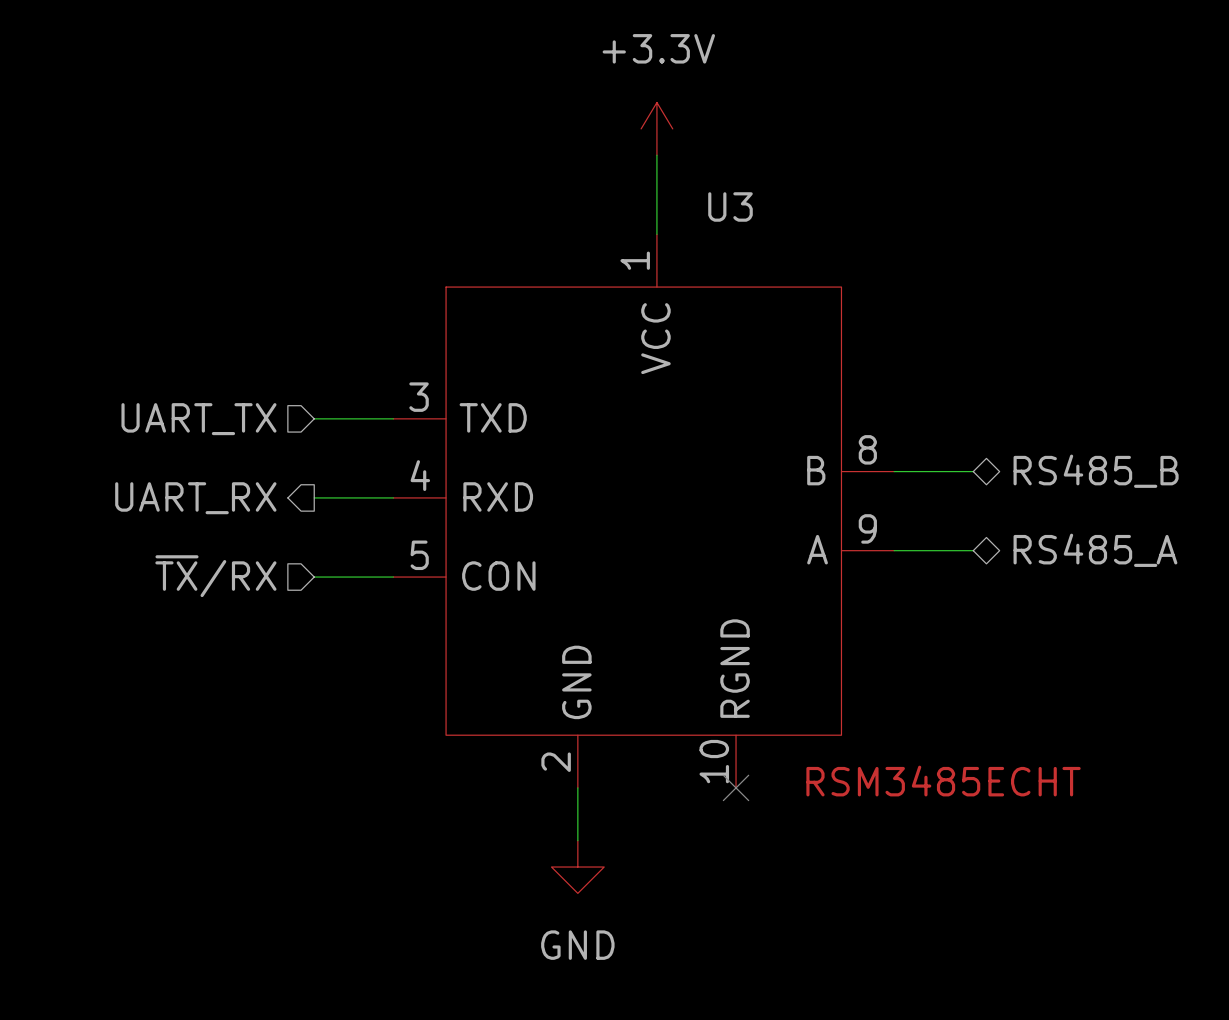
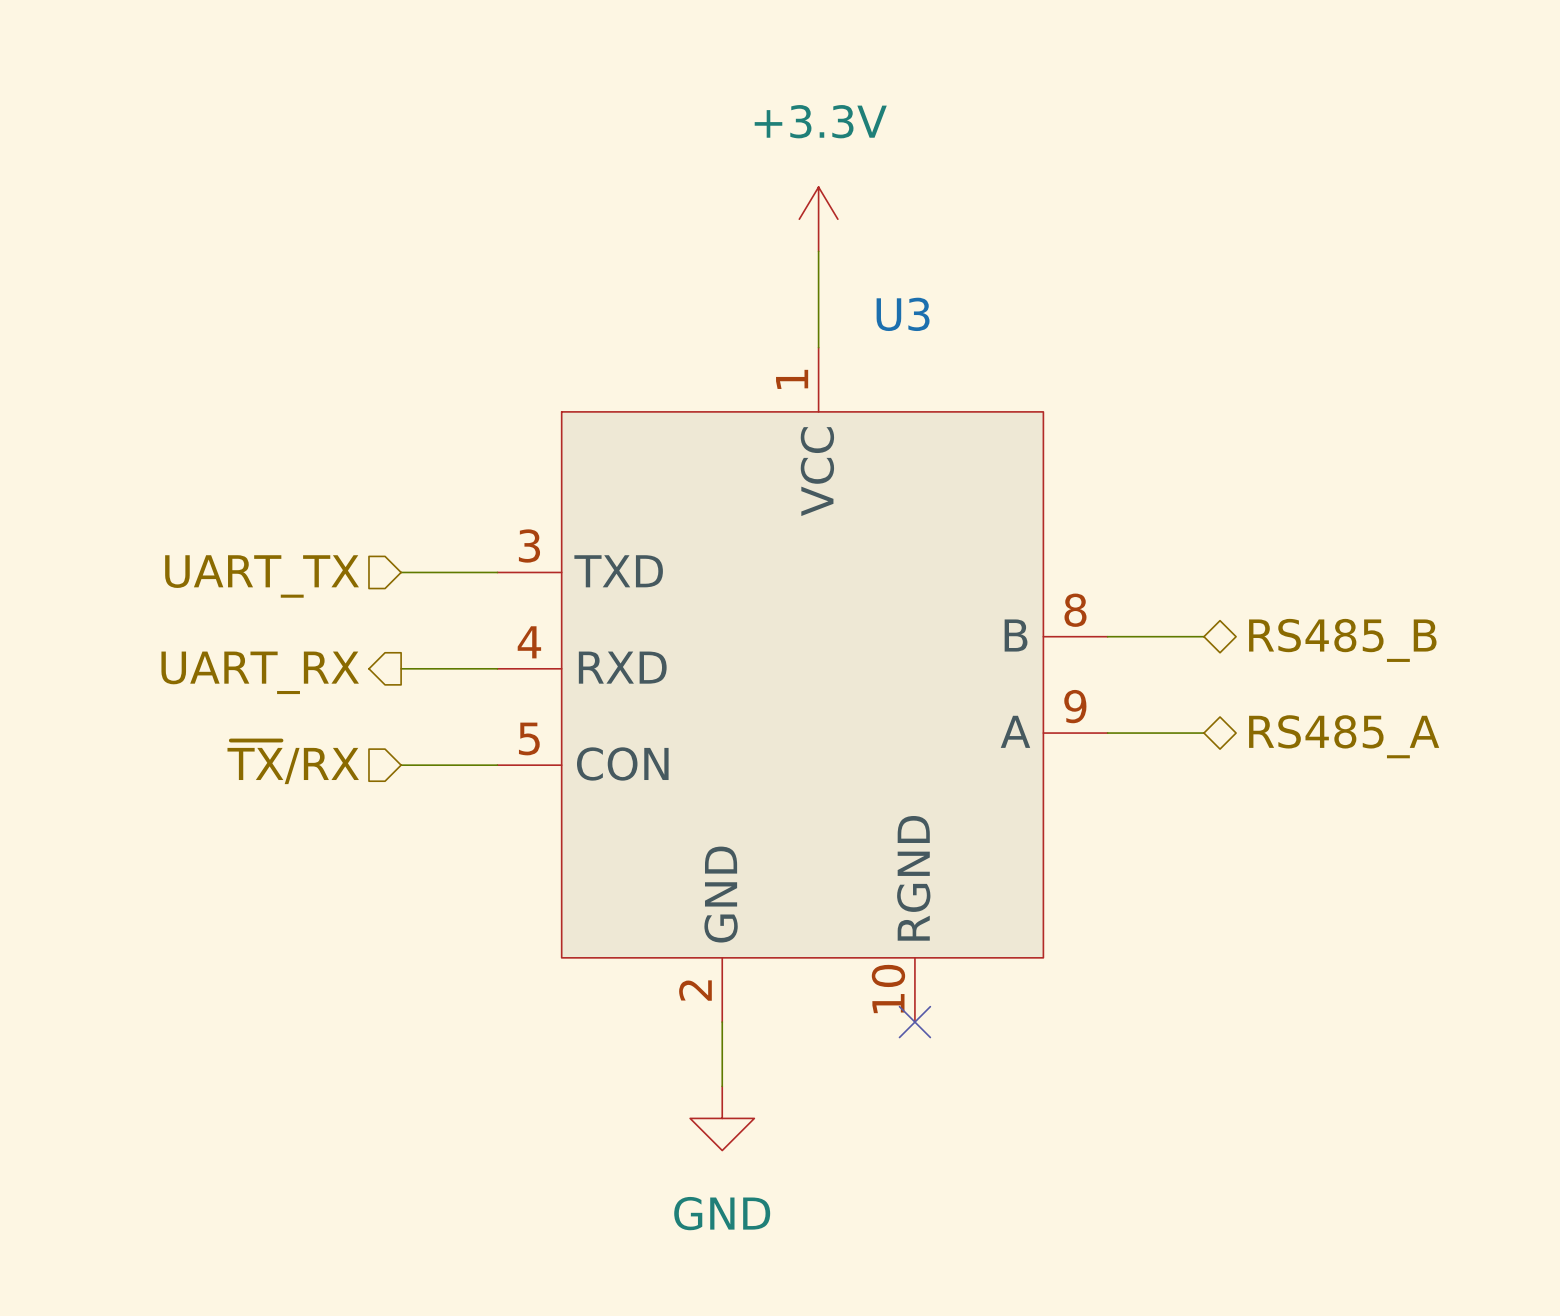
U3 text: RSM3485ECHT (943, 781) -> none

